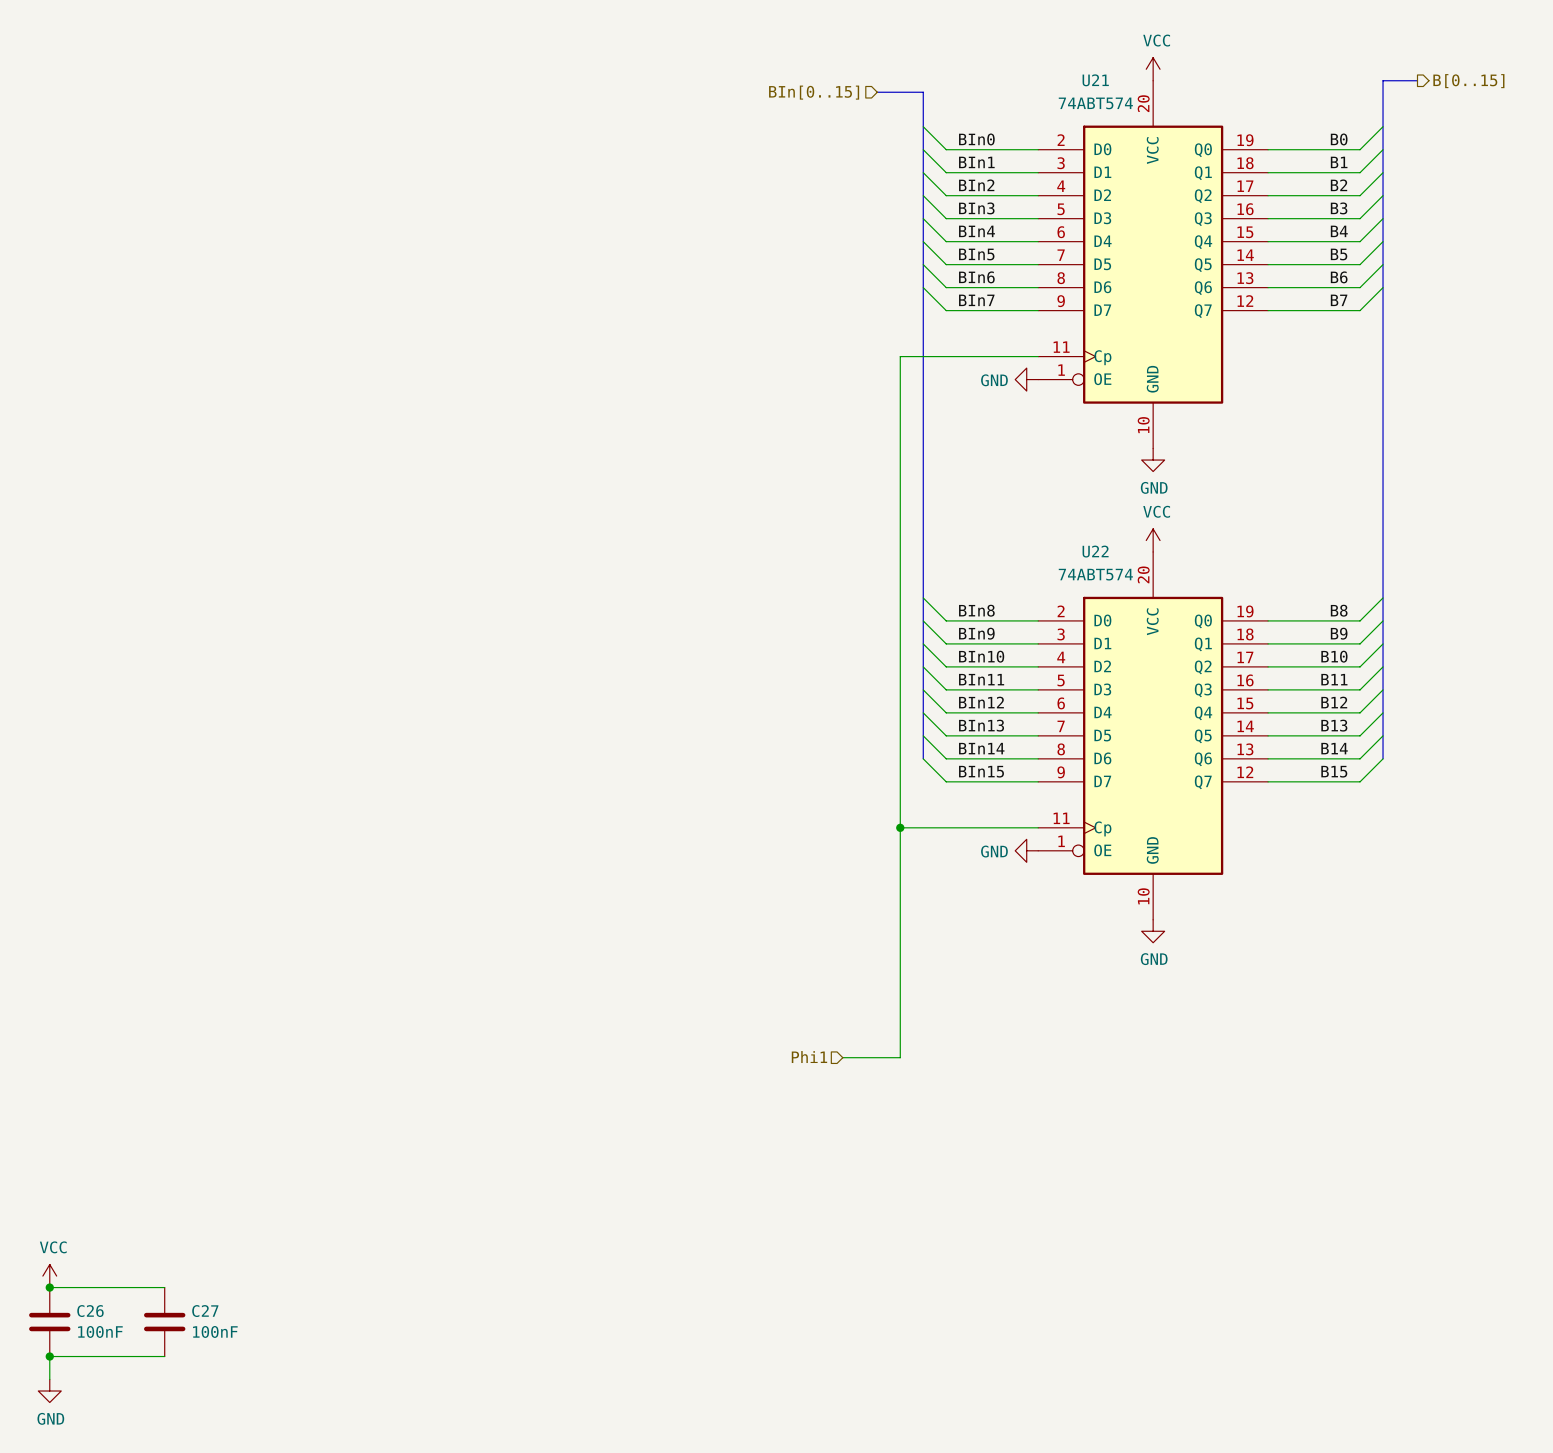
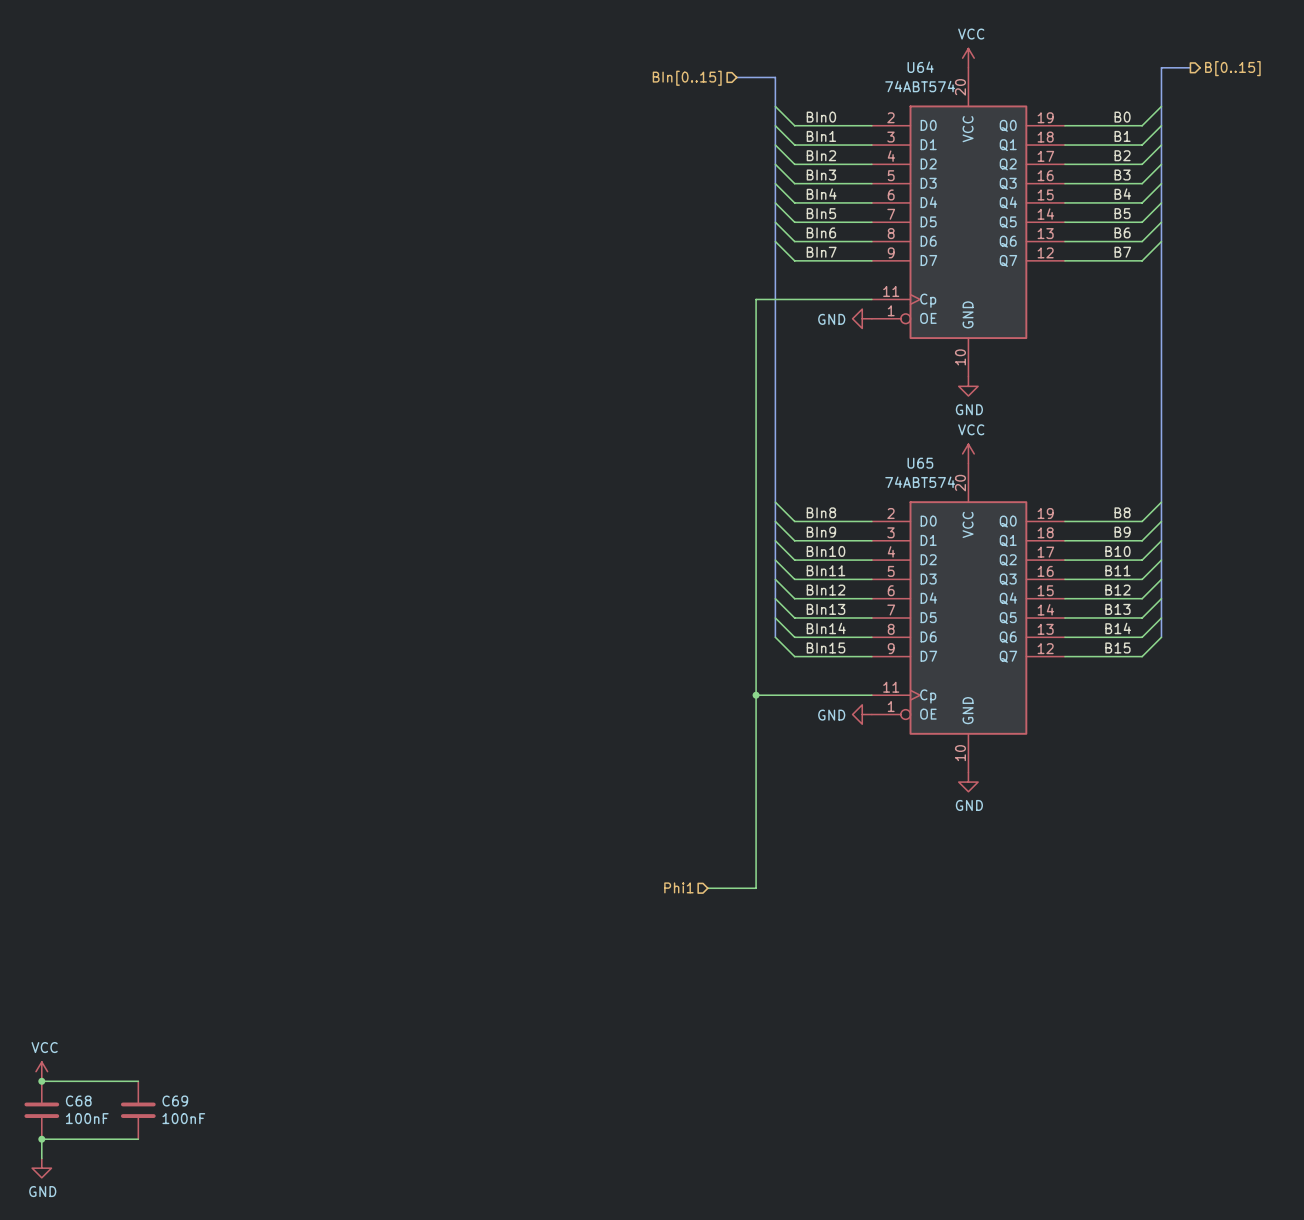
U21 name: U21 (1095, 80) -> U64 (920, 67)
U22 name: U22 (1095, 551) -> U65 (920, 463)
C26 name: C26 (90, 1311) -> C68 (78, 1101)
C27 name: C27 (205, 1311) -> C69 (175, 1101)

